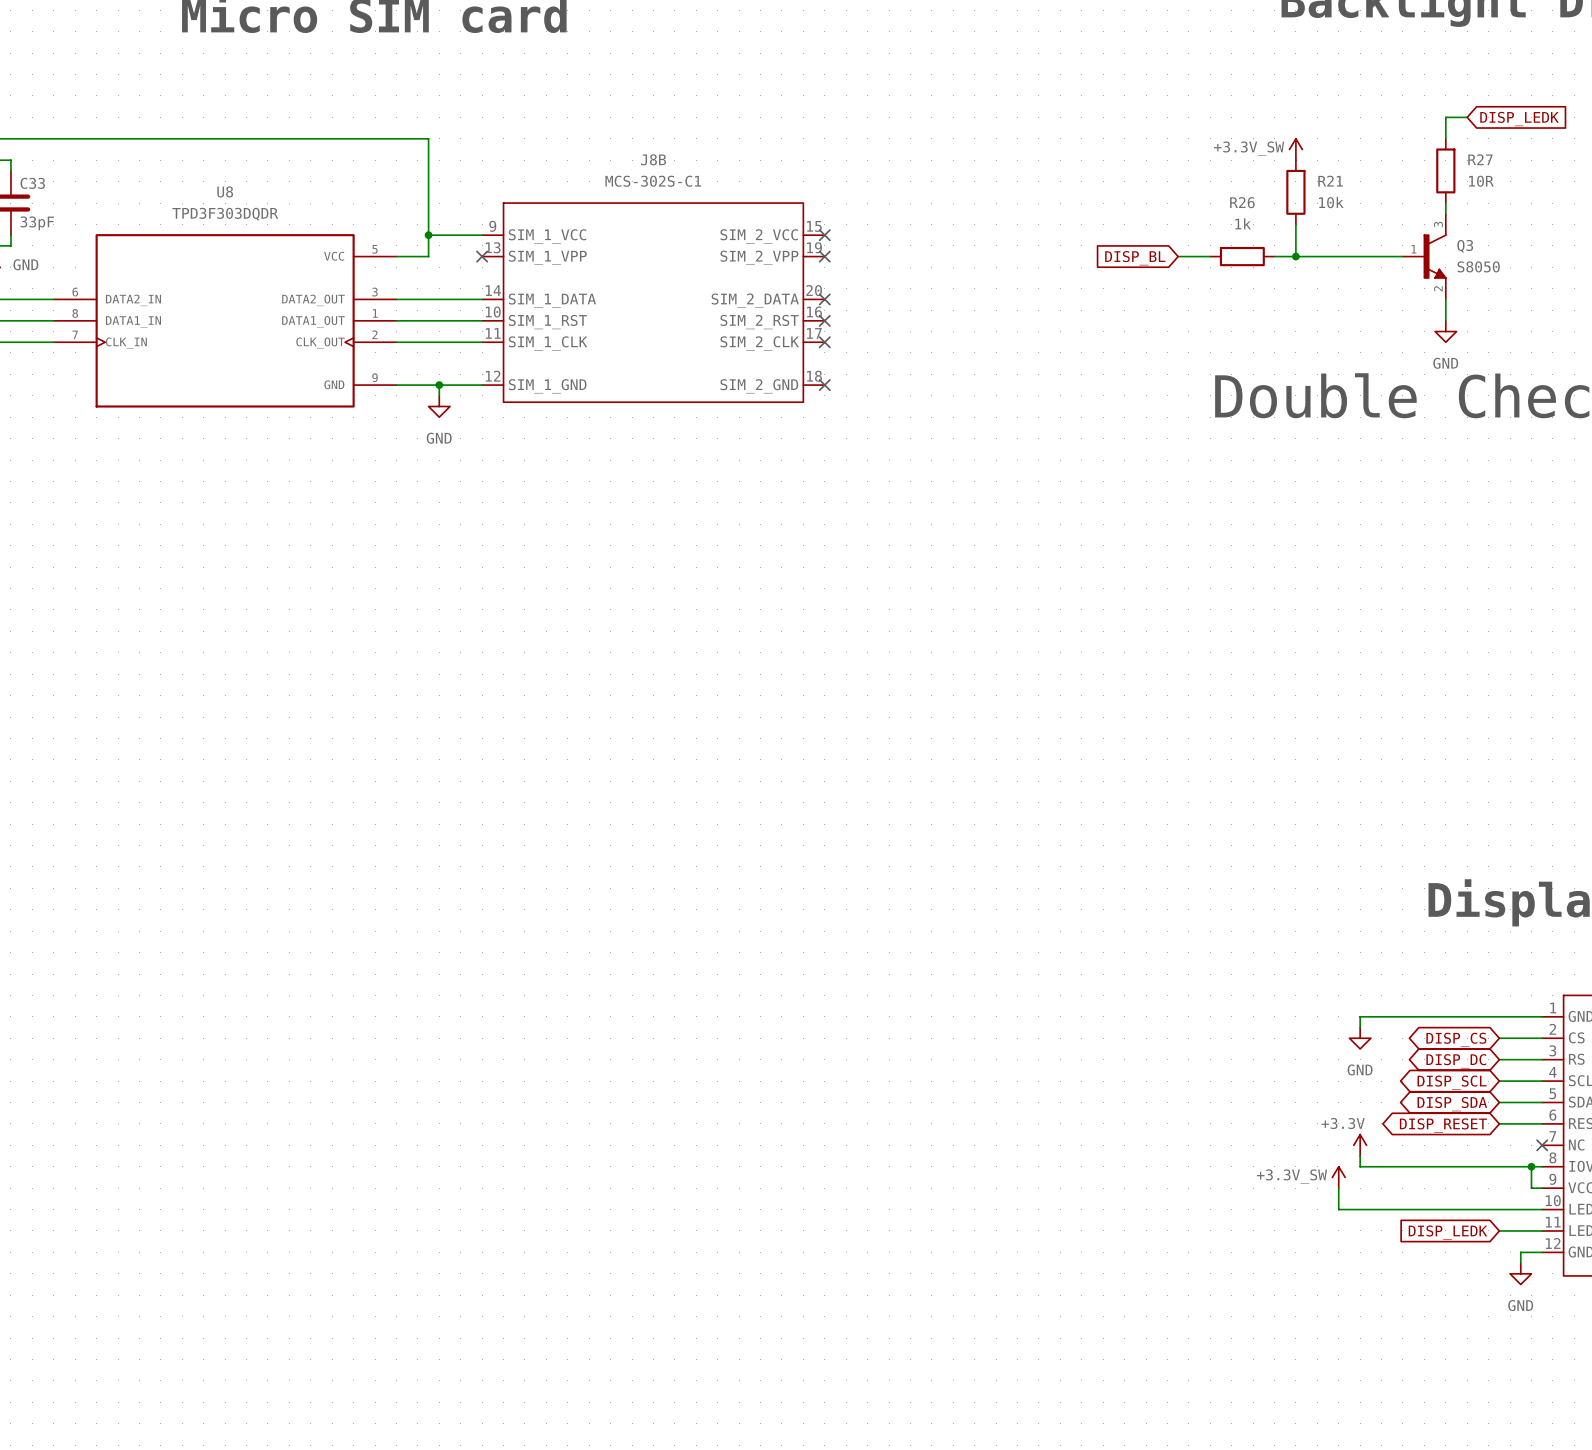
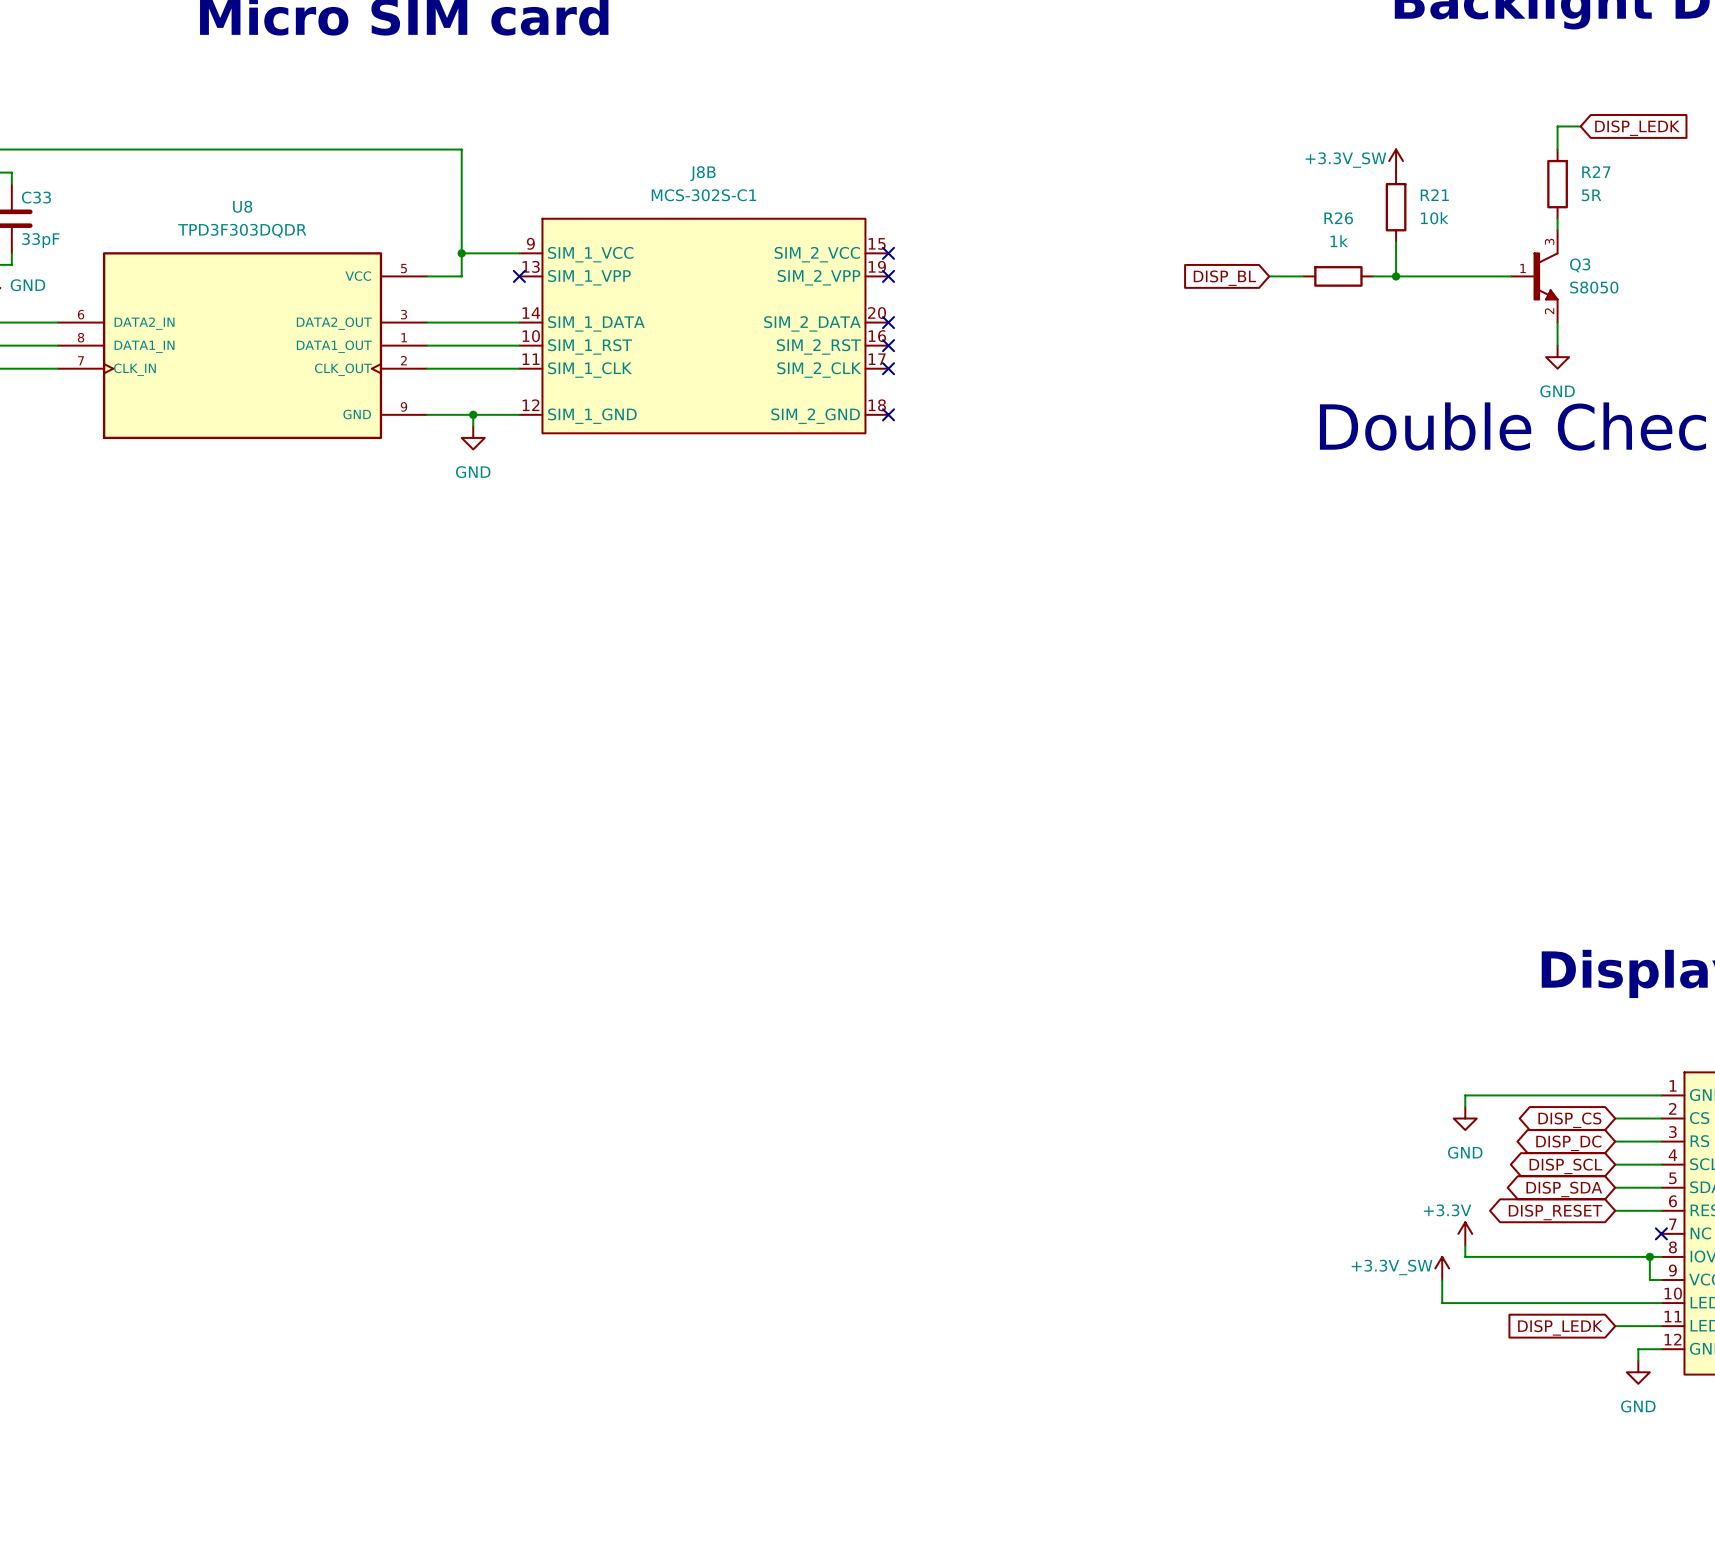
R27 value: 10R (1481, 181) -> 5R (1591, 195)

